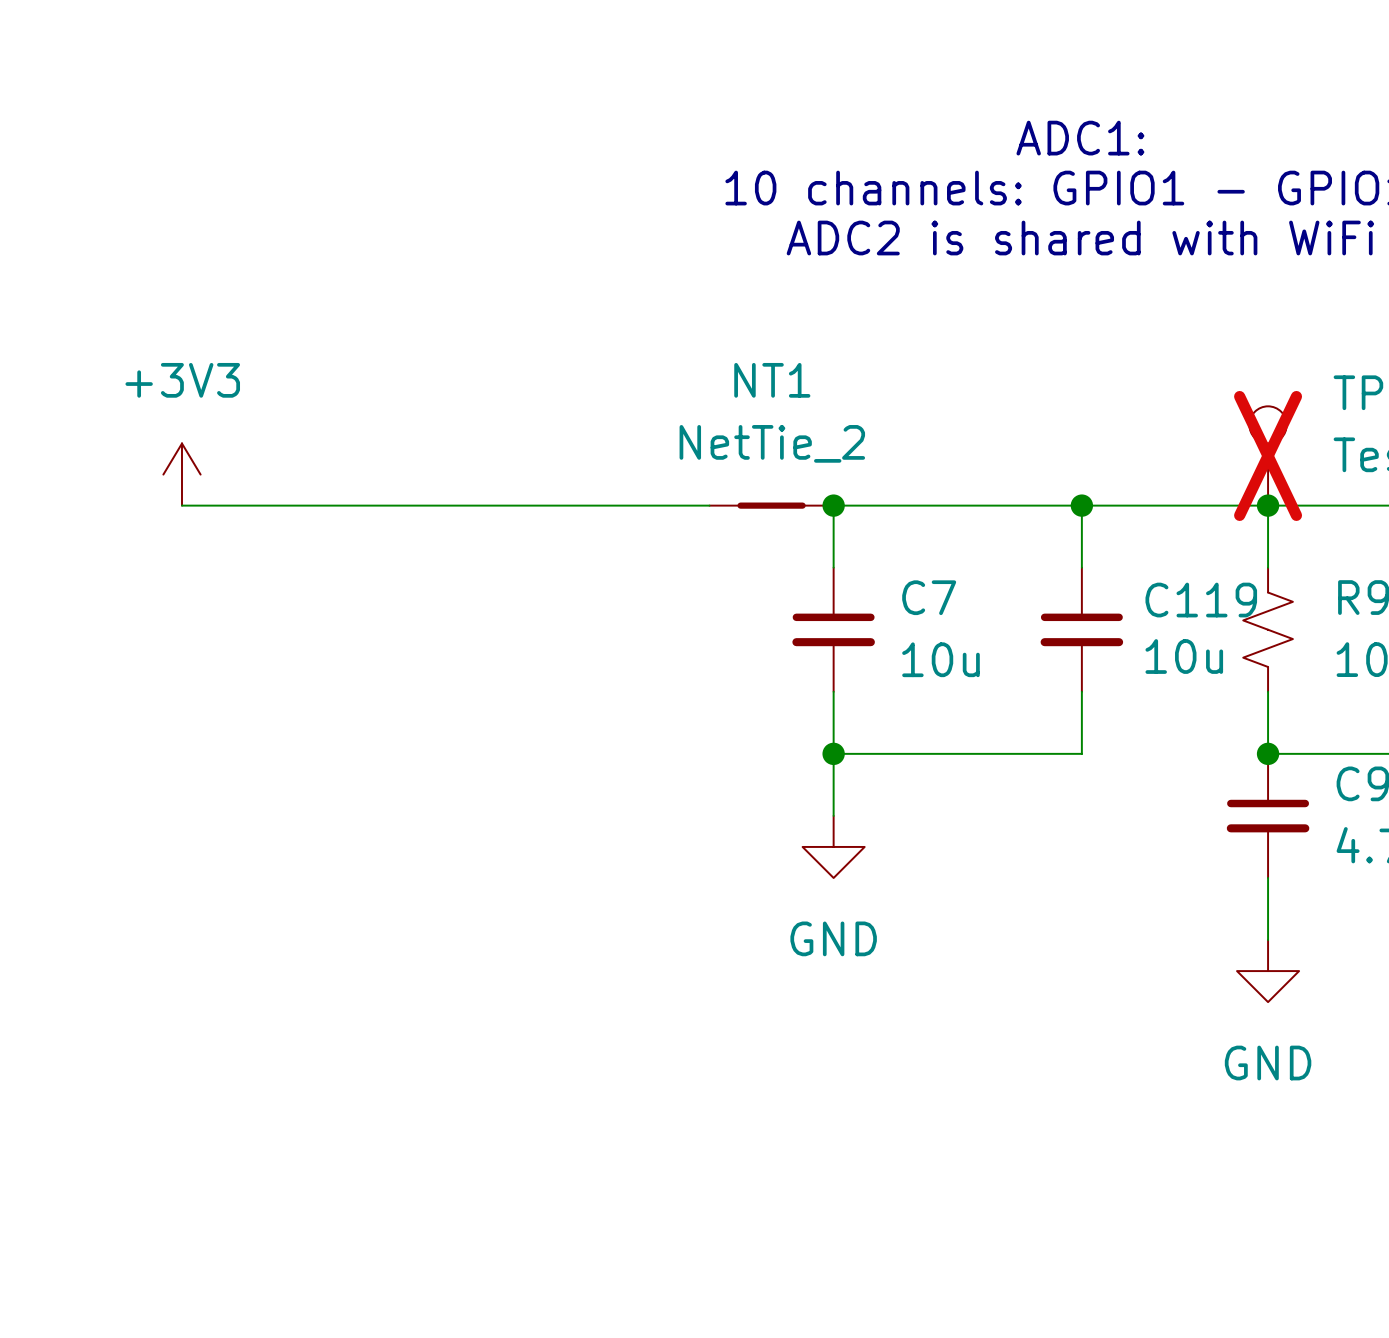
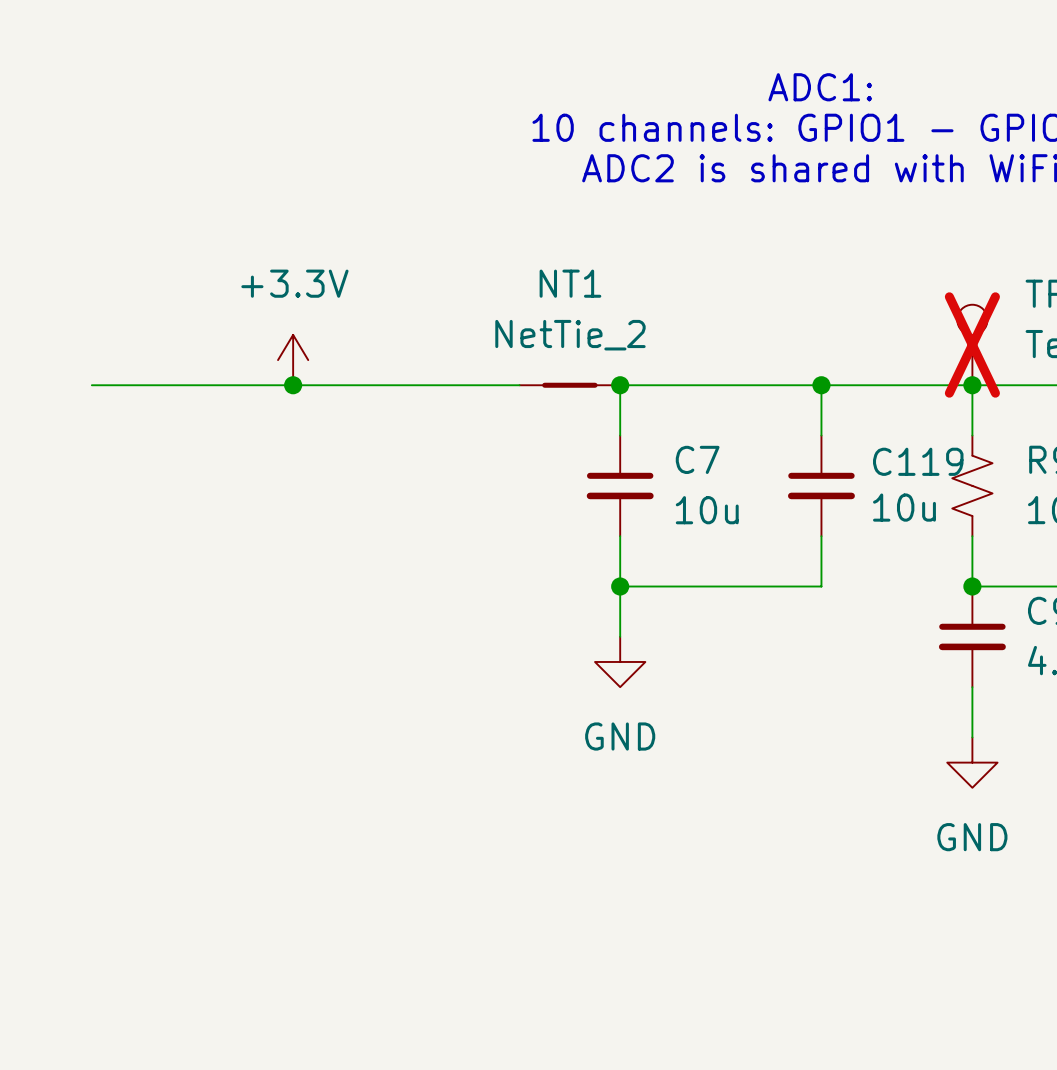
power symbol: +3V3 (181, 474) -> none
power symbol: none -> +3.3V (293, 360)
junction: none -> (293, 385)

